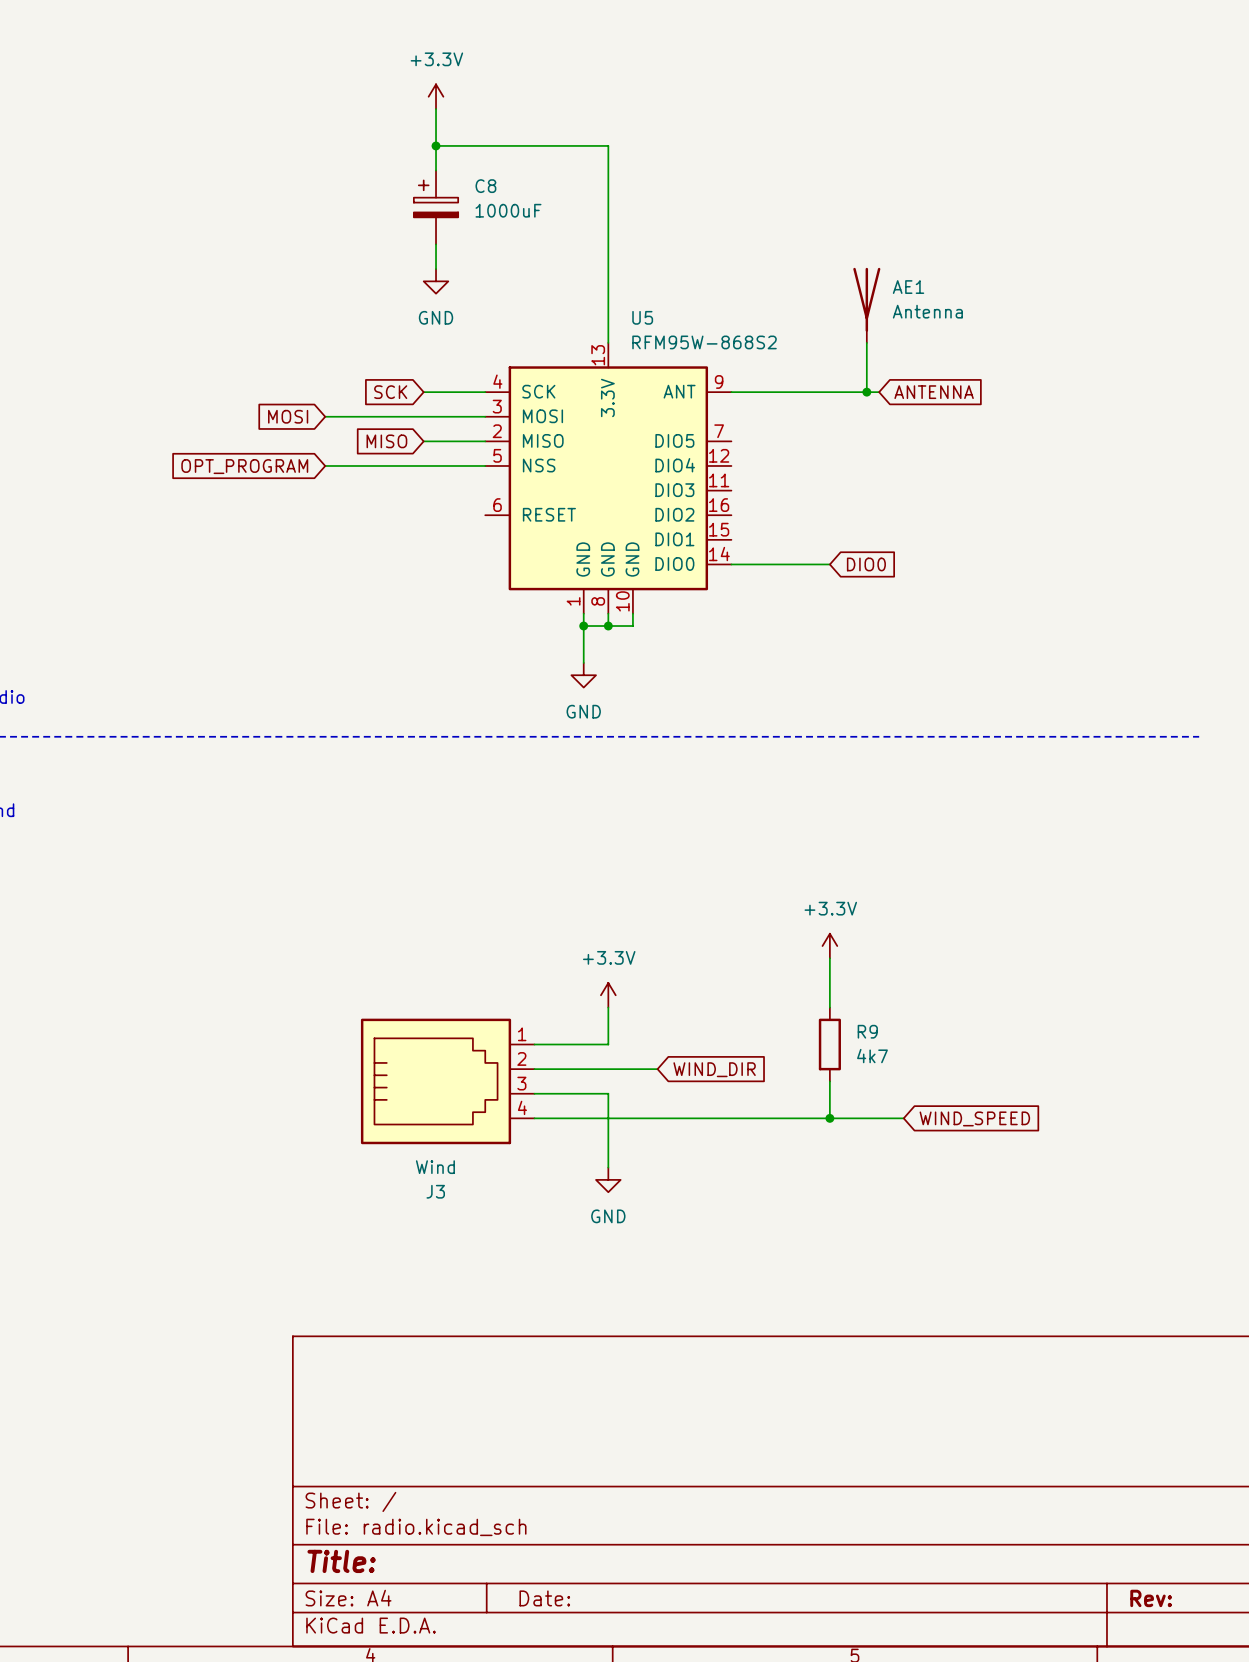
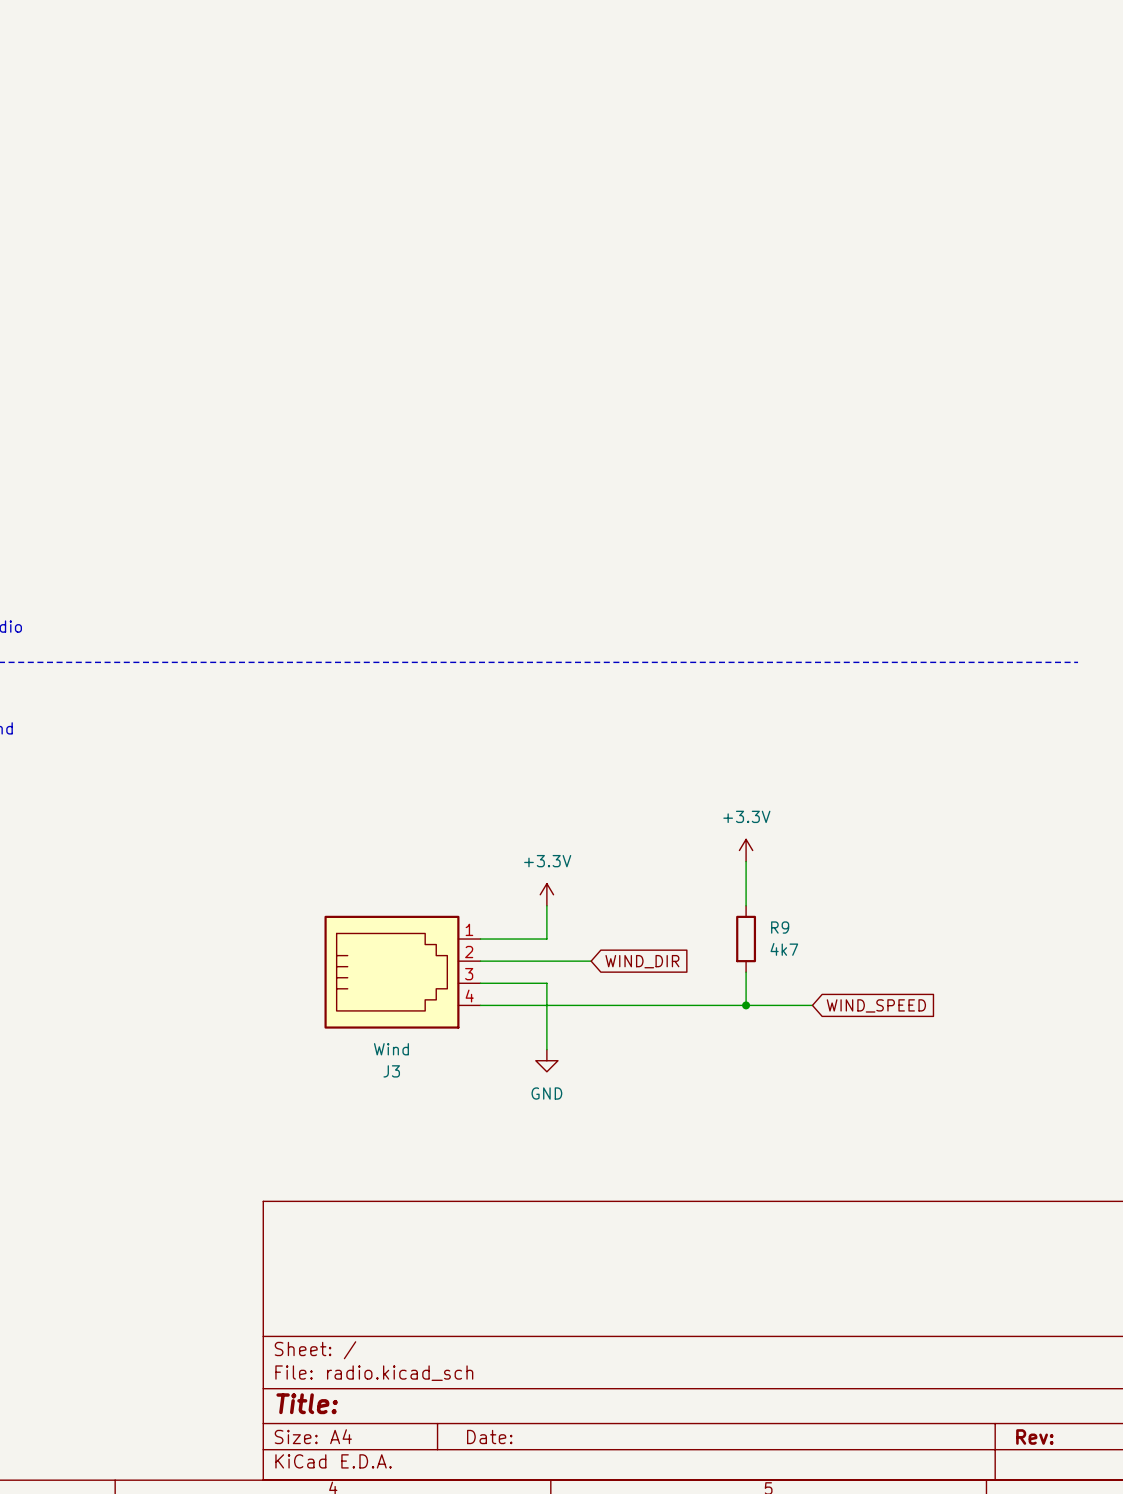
power symbol: +3.3V (436, 96) -> none
wire: (436, 109) (436, 170) -> none
wire: (436, 145) (608, 145) (608, 342) -> none
junction: (436, 145) -> none
C8: 1000uF (436, 207) -> none
wire: (436, 244) (436, 269) -> none
power symbol: GND (436, 281) -> none
AE1: Antenna (866, 305) -> none
wire: (866, 342) (866, 392) -> none
global label: SCK (390, 392) -> none
wire: (423, 392) (485, 392) -> none
wire: (731, 392) (879, 392) -> none
junction: (866, 392) -> none
global label: ANTENNA (934, 392) -> none
global label: MOSI (288, 416) -> none
wire: (325, 416) (485, 416) -> none
global label: MISO (386, 441) -> none
wire: (423, 441) (485, 441) -> none
wire: (325, 465) (485, 465) -> none
global label: OPT_PROGRAM (244, 466) -> none
U5: RFM95W-868S2 (608, 478) -> none
wire: (731, 564) (829, 564) -> none
global label: DIO0 (866, 564) -> none
wire: (583, 613) (583, 662) -> none
wire: (608, 613) (608, 626) -> none
wire: (632, 613) (632, 626) (583, 626) -> none
junction: (583, 626) -> none
junction: (608, 626) -> none
power symbol: GND (583, 675) -> none

